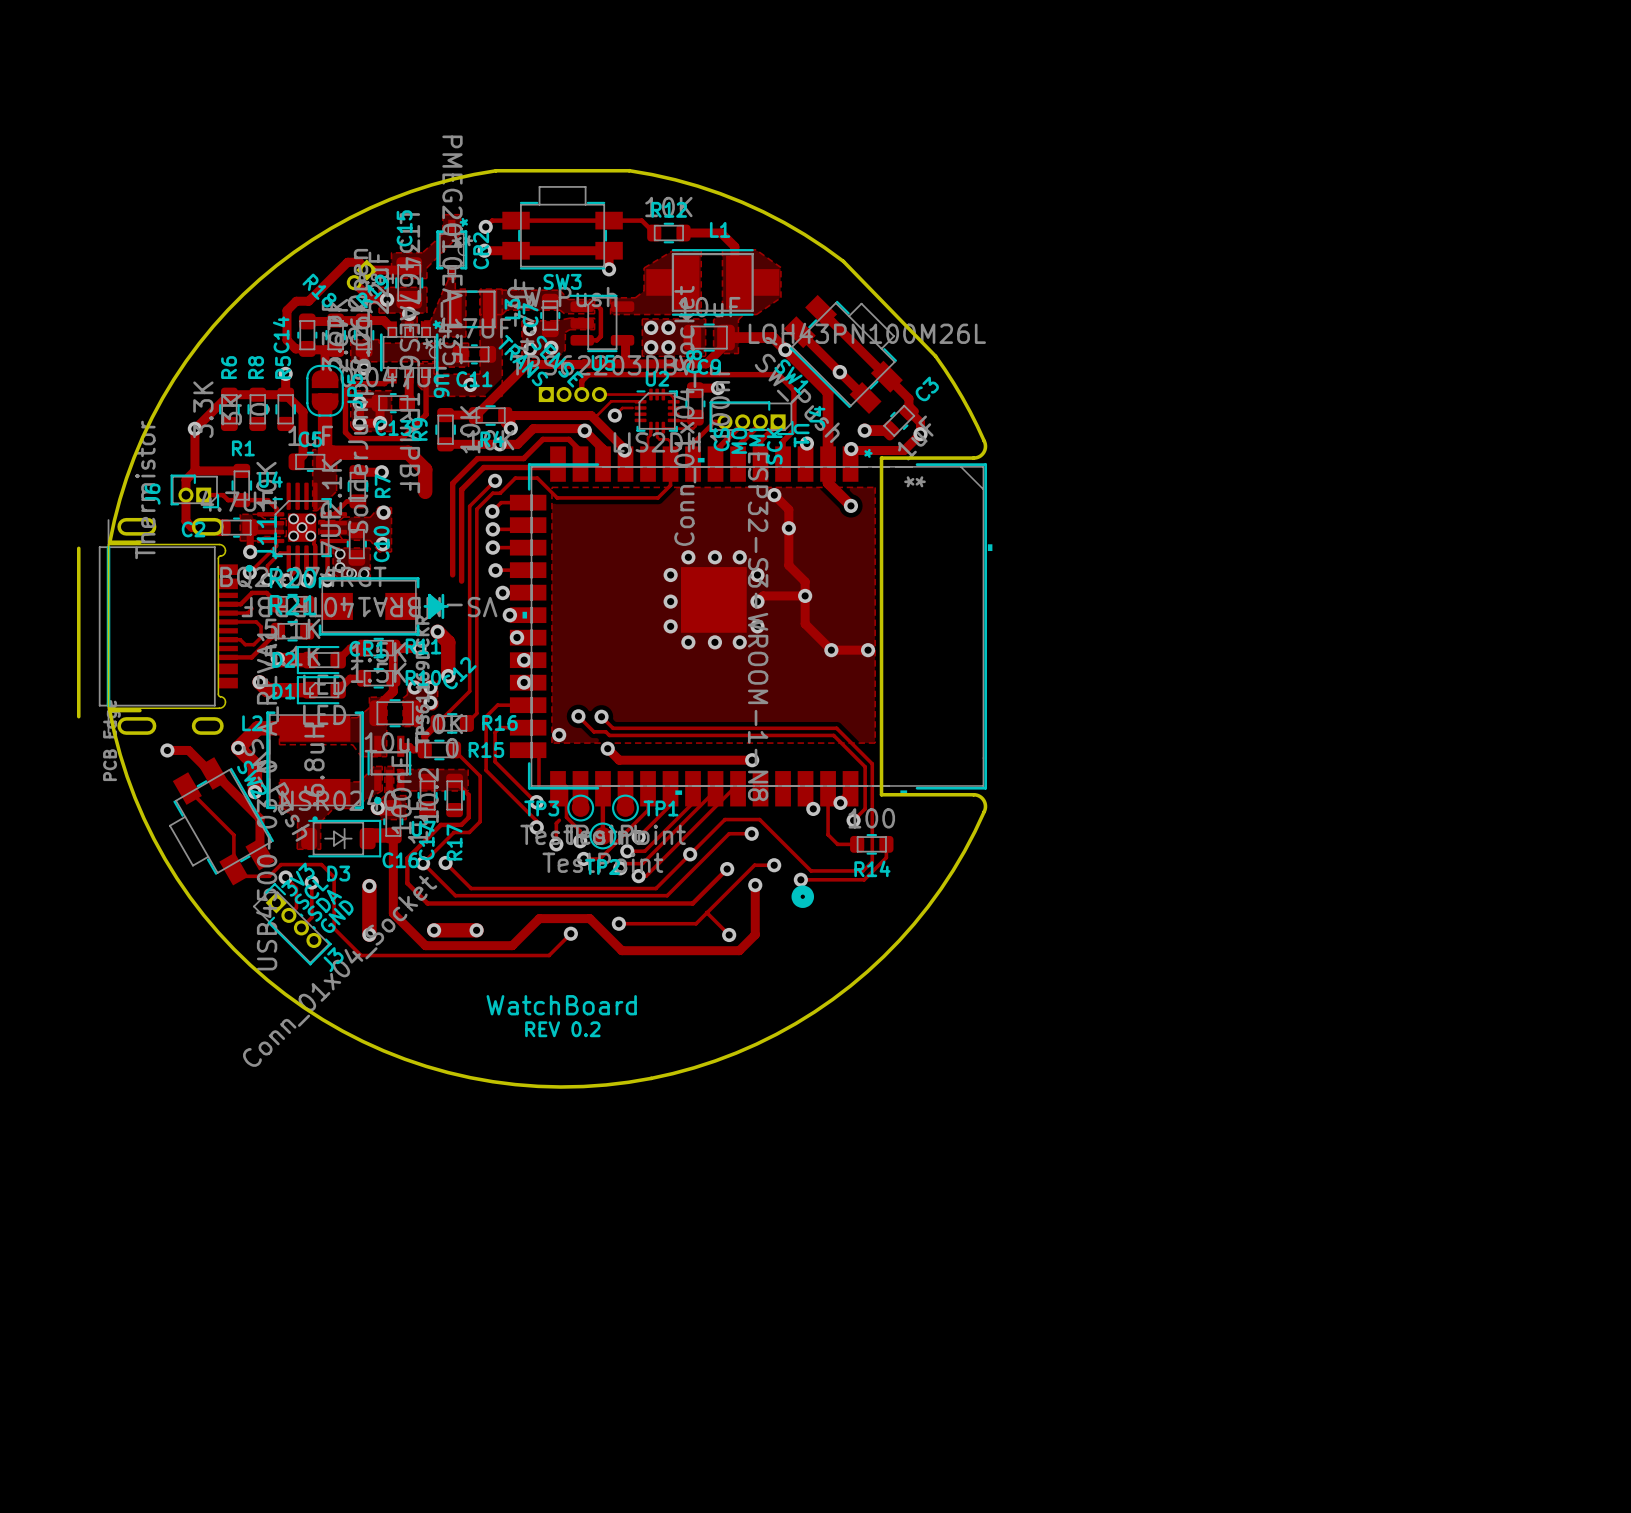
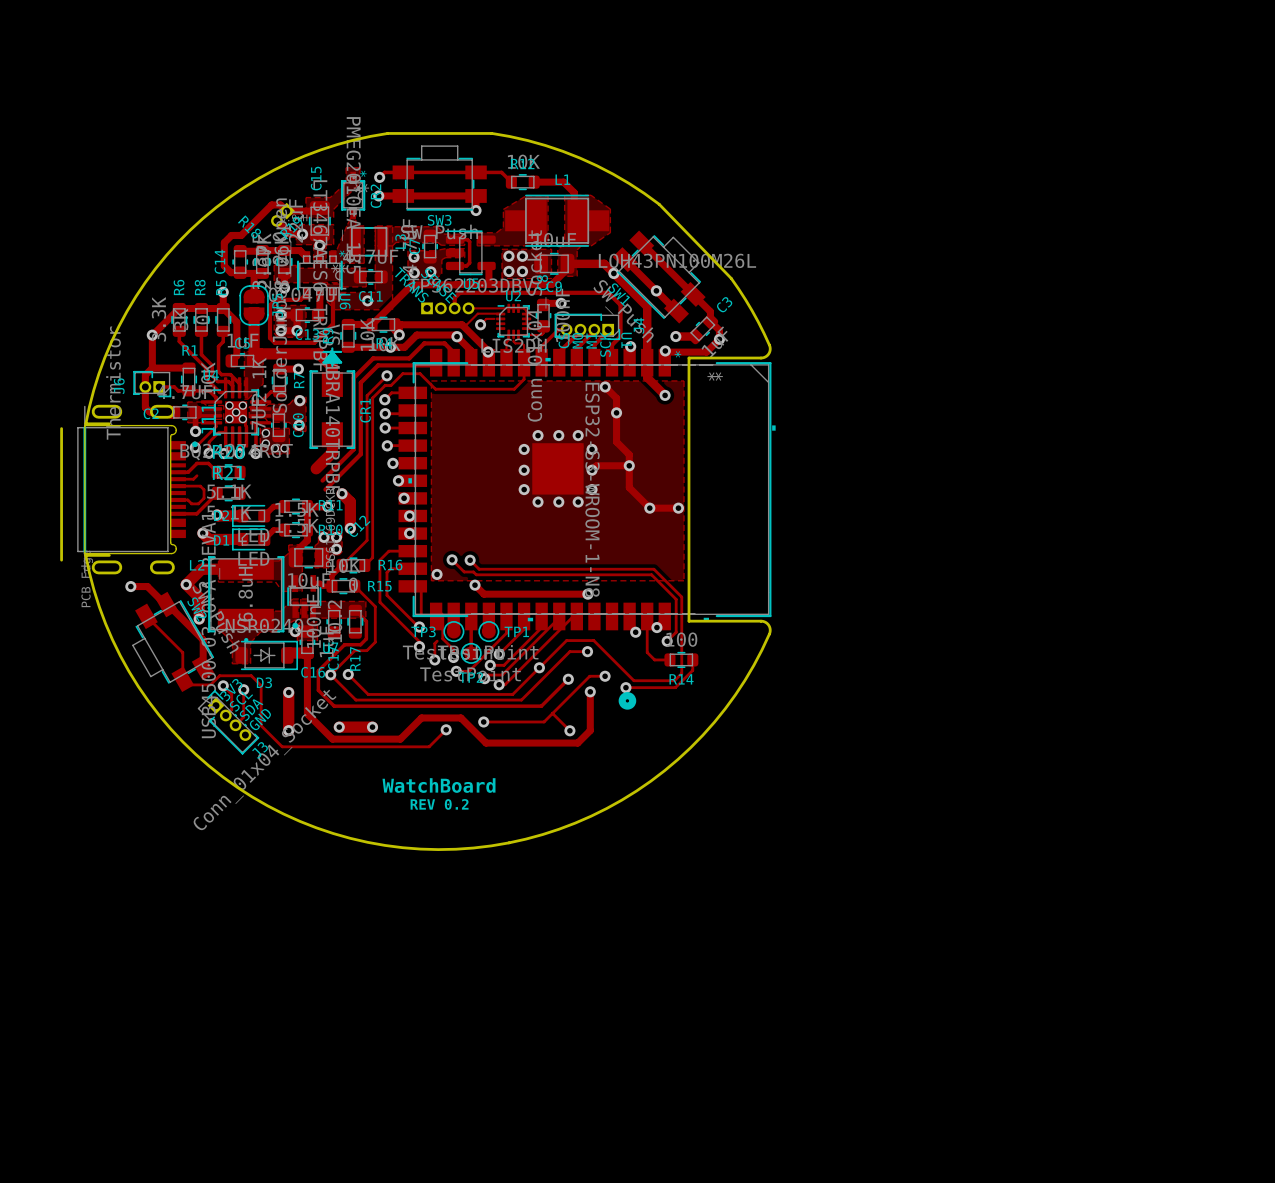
track: none -> (179, 331) (179, 341) (205, 368) (205, 378) (219, 392) (225, 392)
track: none -> (201, 331) (201, 354) (212, 365) (212, 375) (217, 381) (228, 381) (232, 385) (232, 392)
track: none -> (223, 331) (223, 341) (218, 346) (218, 371) (221, 374) (230, 374) (239, 383) (239, 392)
track: none -> (332, 434) (332, 452) (316, 468)
track: none -> (353, 449) (322, 480)
track: none -> (360, 454) (325, 489)
CR1 rotation: 0° (383, 606) -> 90° counterclockwise (332, 398)
CR1 position: (383, 606) -> (332, 398)

